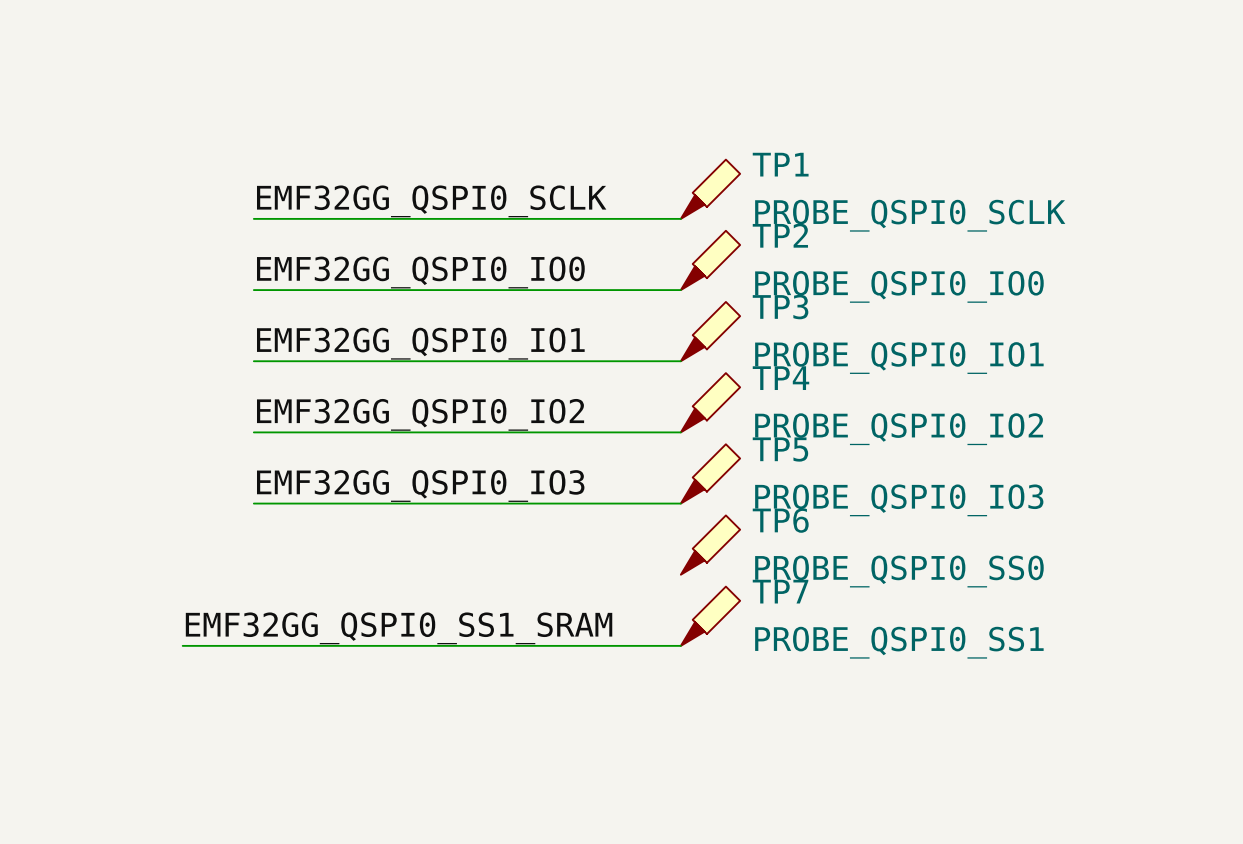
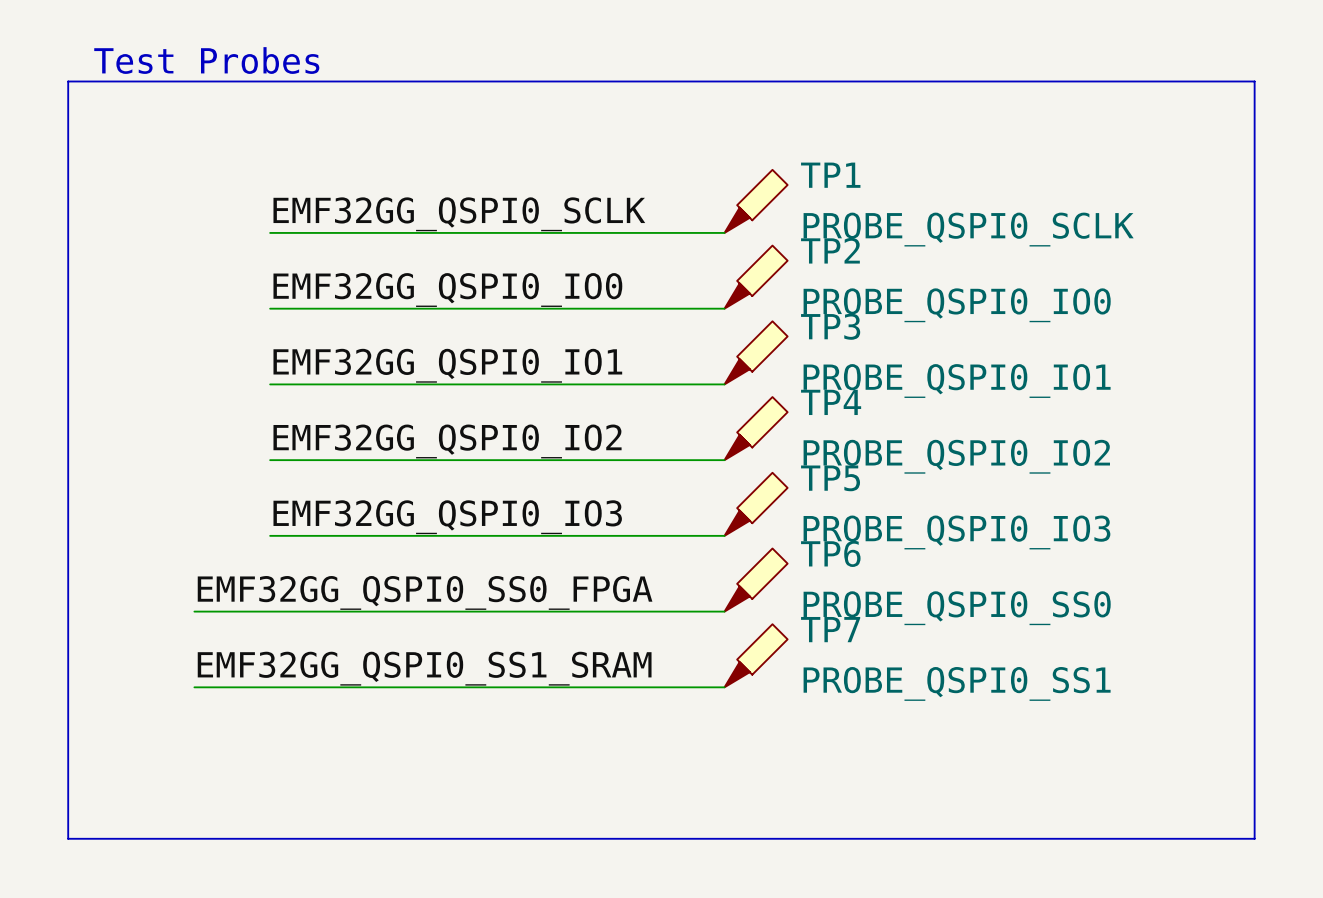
text: none -> Test Probes (206, 60)
line: none -> (68, 81) (1254, 81) (1254, 838) (68, 838) (68, 81)
label: none -> EMF32GG_QSPI0_SS0_FPGA (425, 592)
wire: none -> (194, 611) (724, 611)

